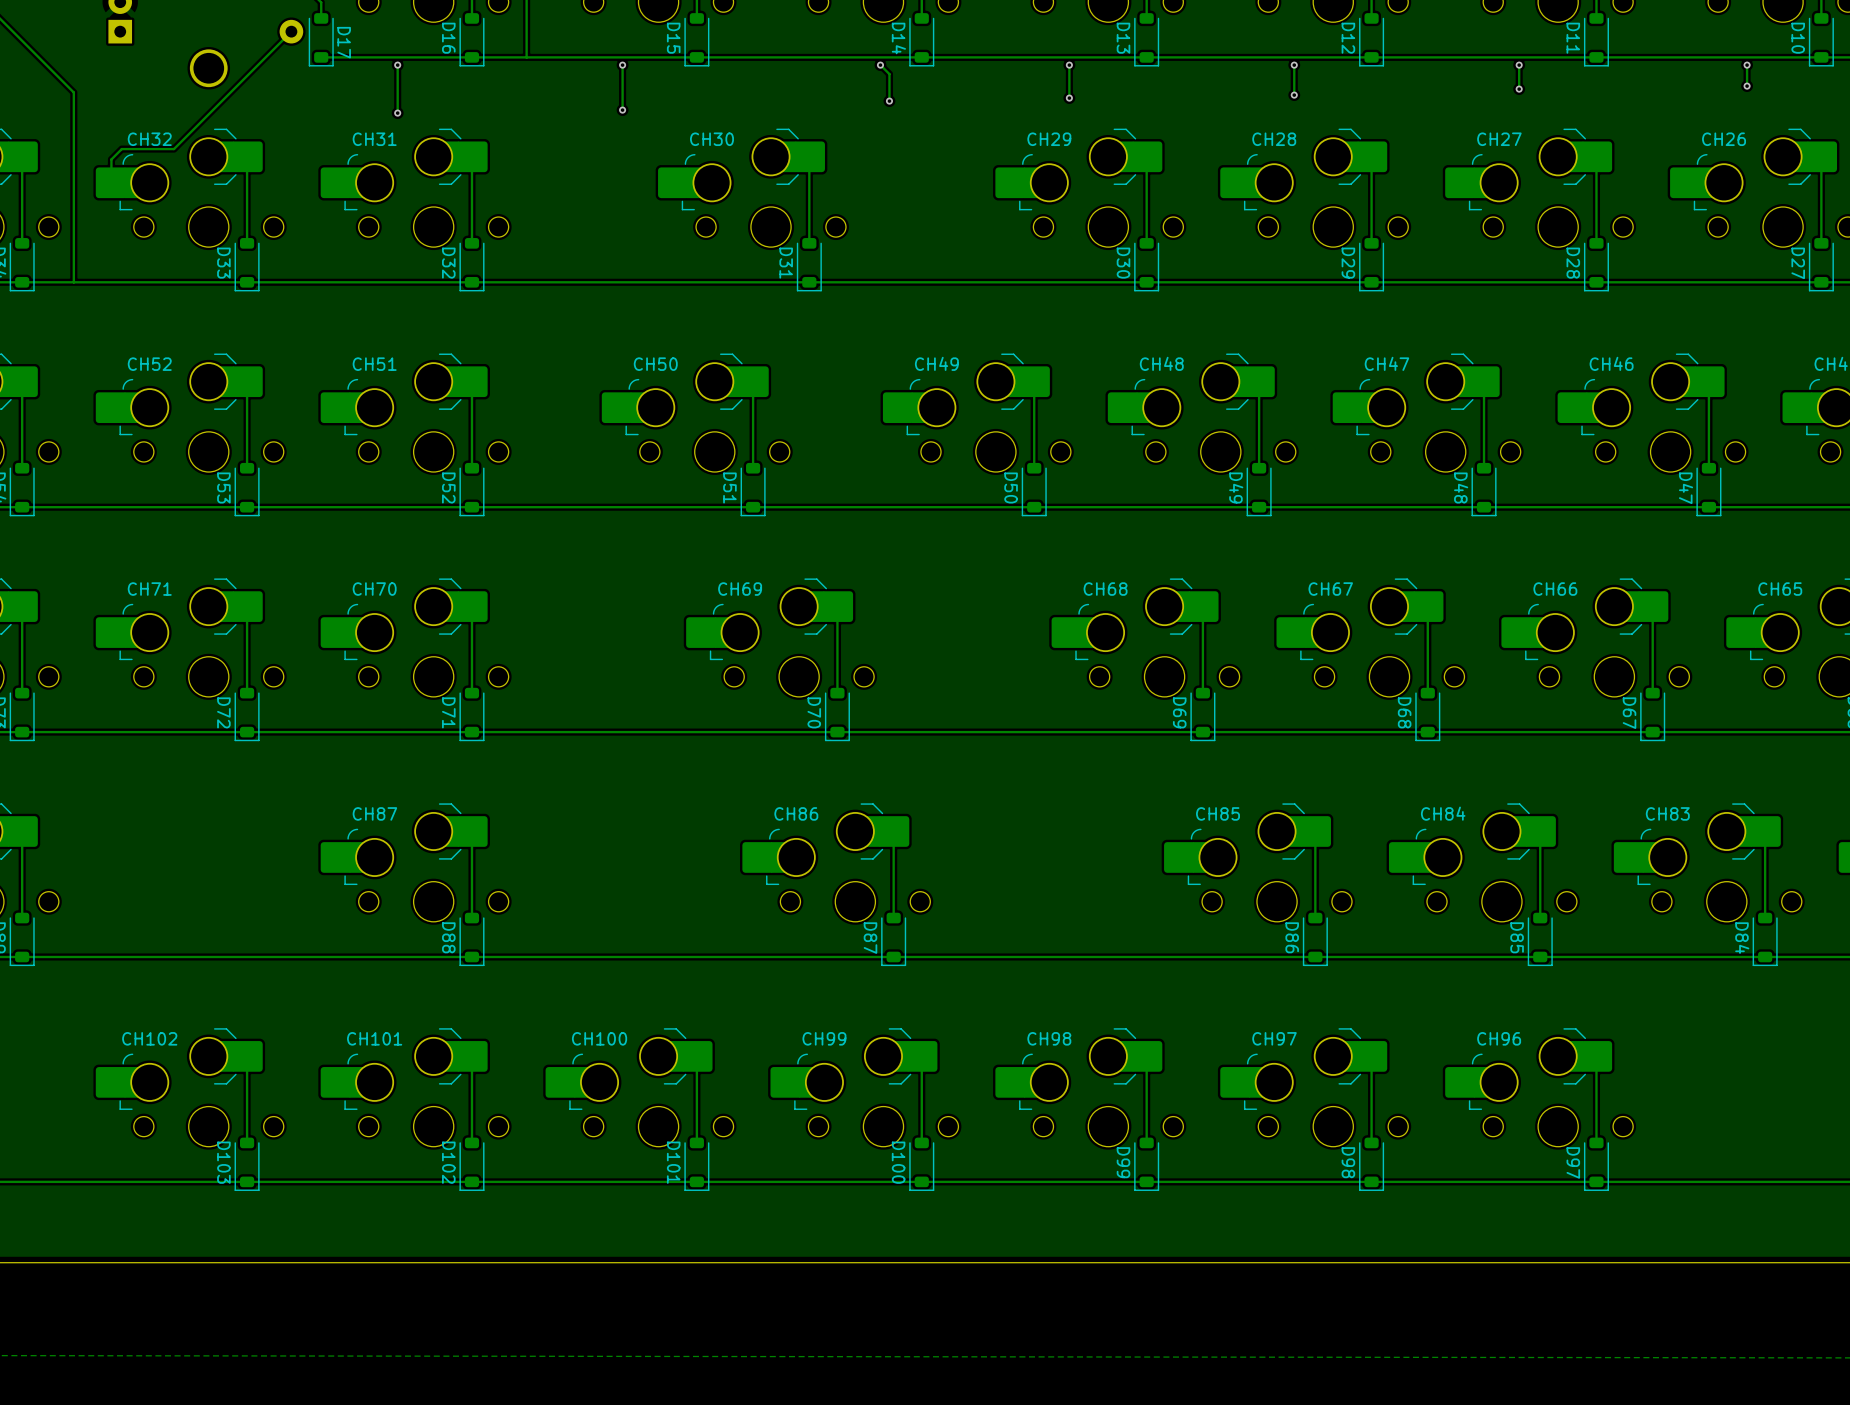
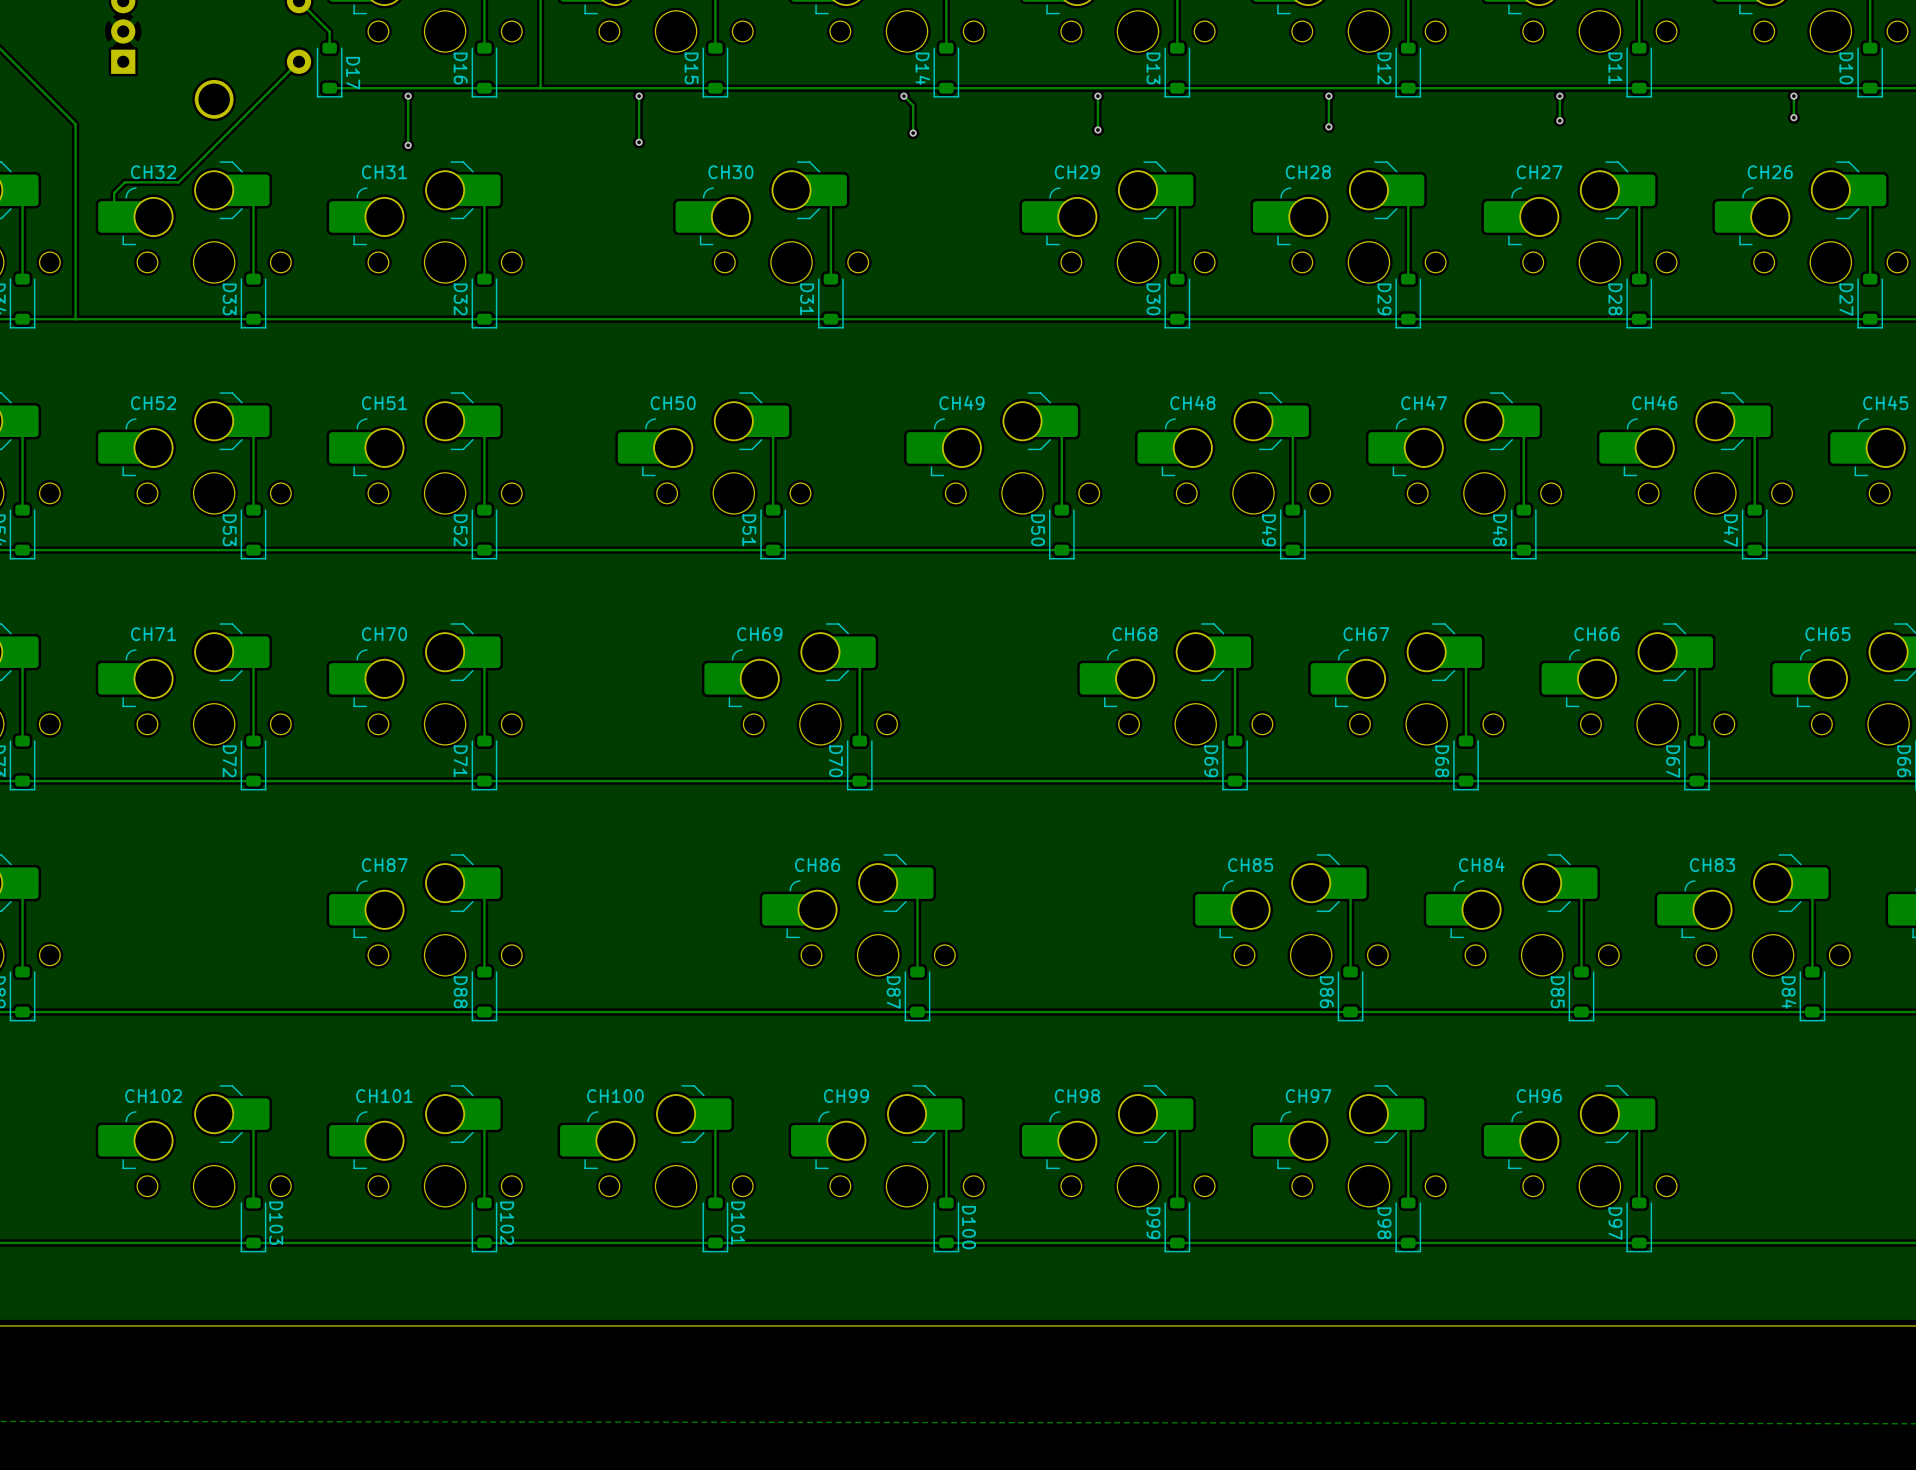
D103 name position: D103 (223, 1162) -> D103 (276, 1223)
D102 name position: D102 (448, 1162) -> D102 (507, 1223)
D101 name position: D101 (673, 1162) -> D101 (738, 1223)
D100 name position: D100 (898, 1162) -> D100 (969, 1227)

